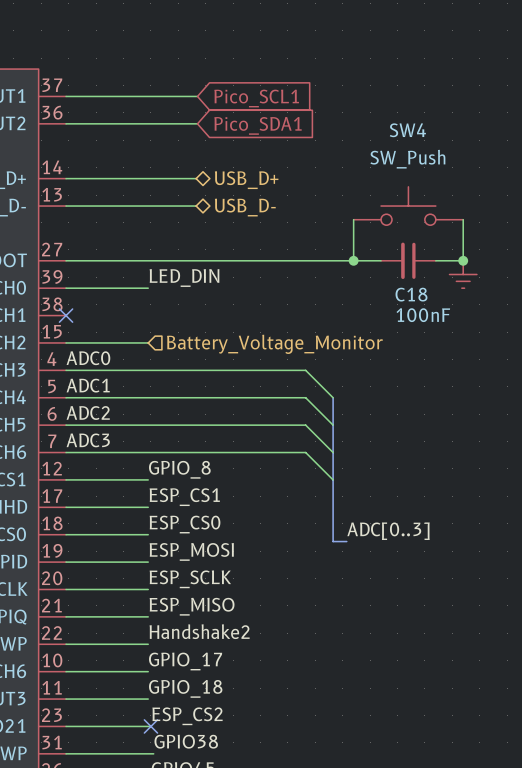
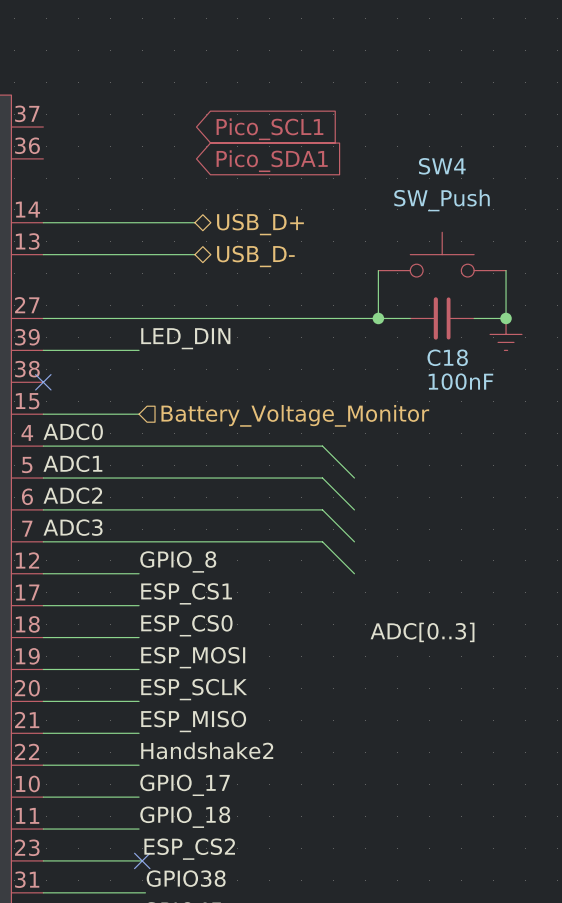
wire: (66, 96) (197, 96) -> none
wire: (66, 123) (197, 123) -> none
bus: (333, 397) (333, 541) (346, 541) -> none

